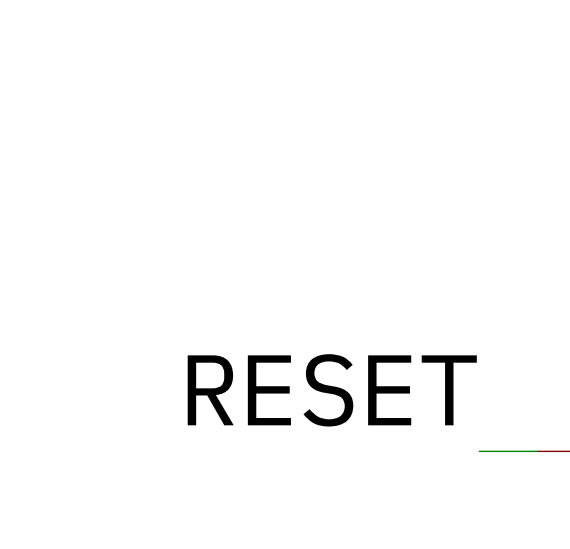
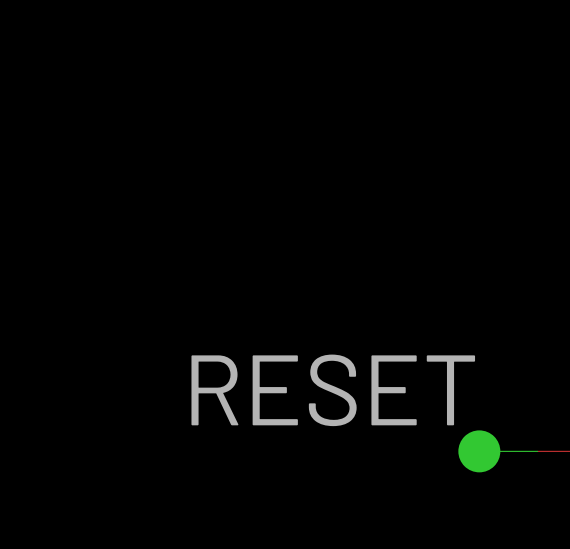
junction: none -> (479, 451)

